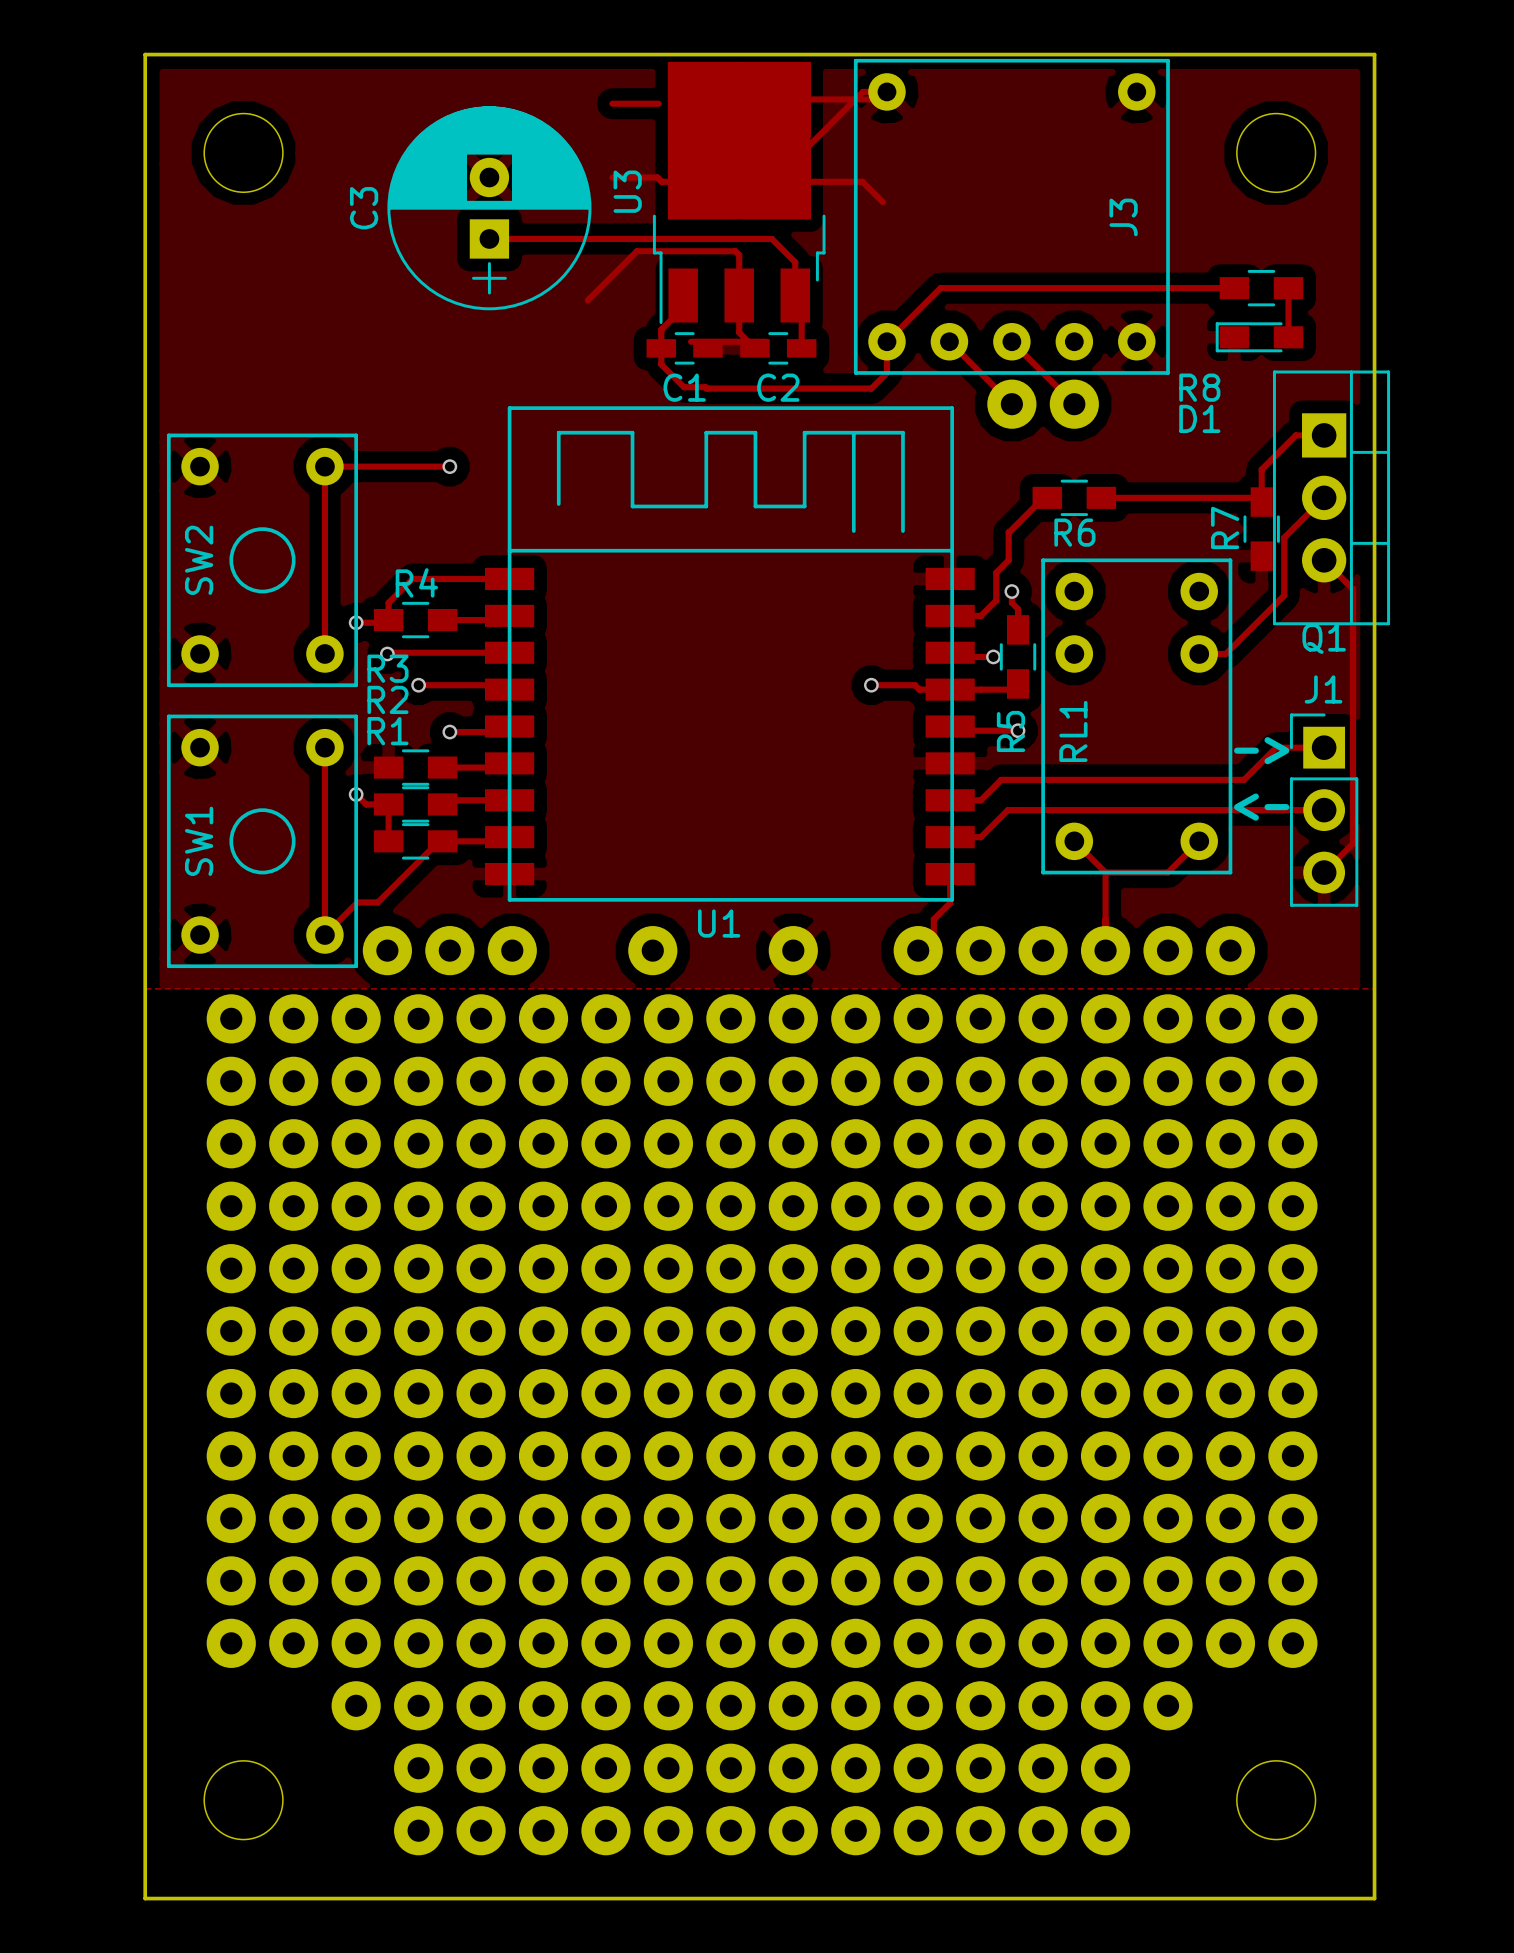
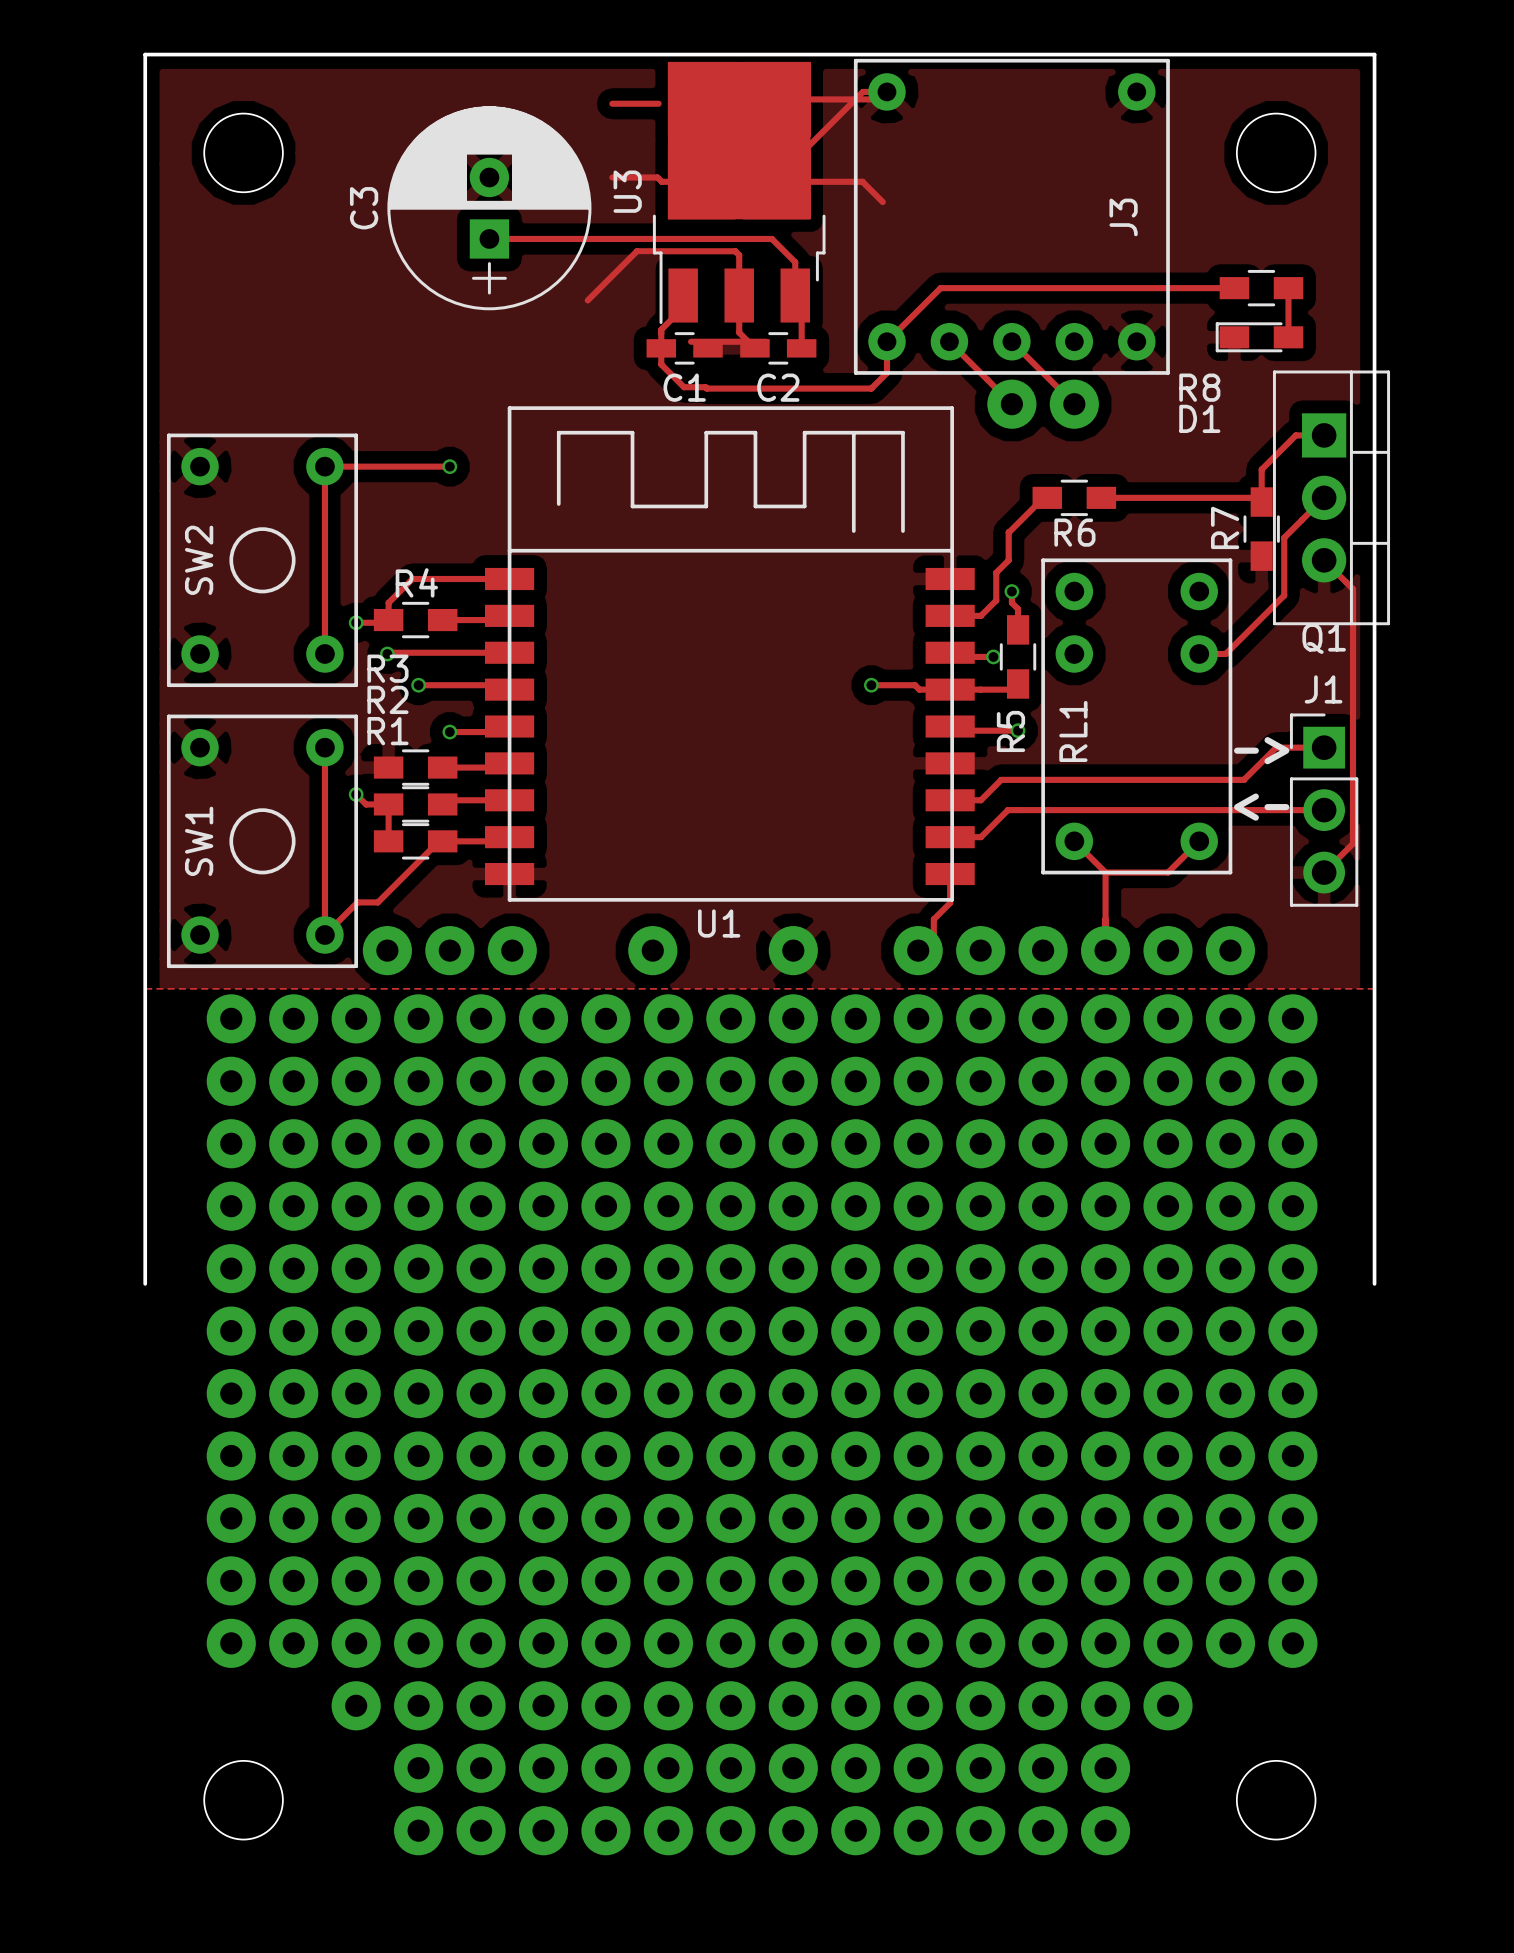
board edge: (145, 1283) (145, 1898) (1374, 1898) (1374, 1283) -> none

